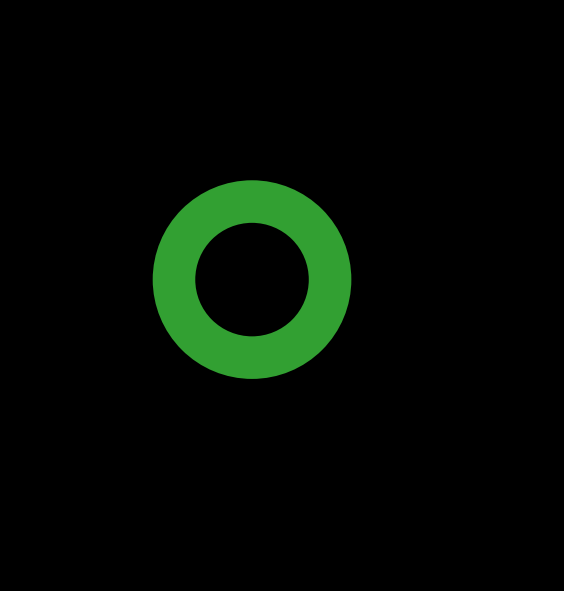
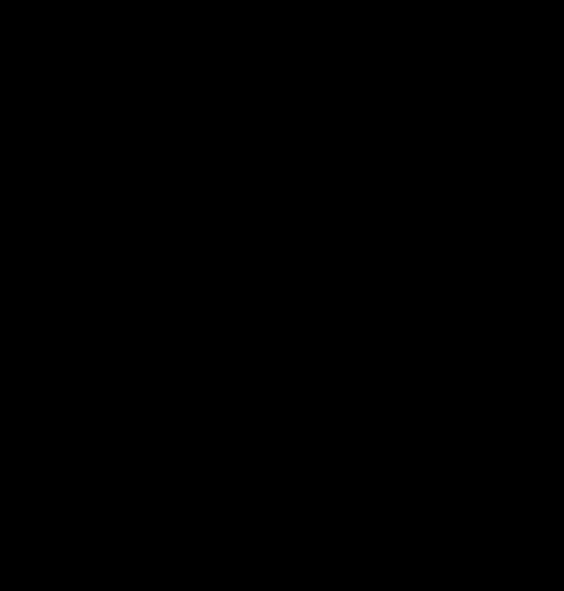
part: (252, 279) -> none

